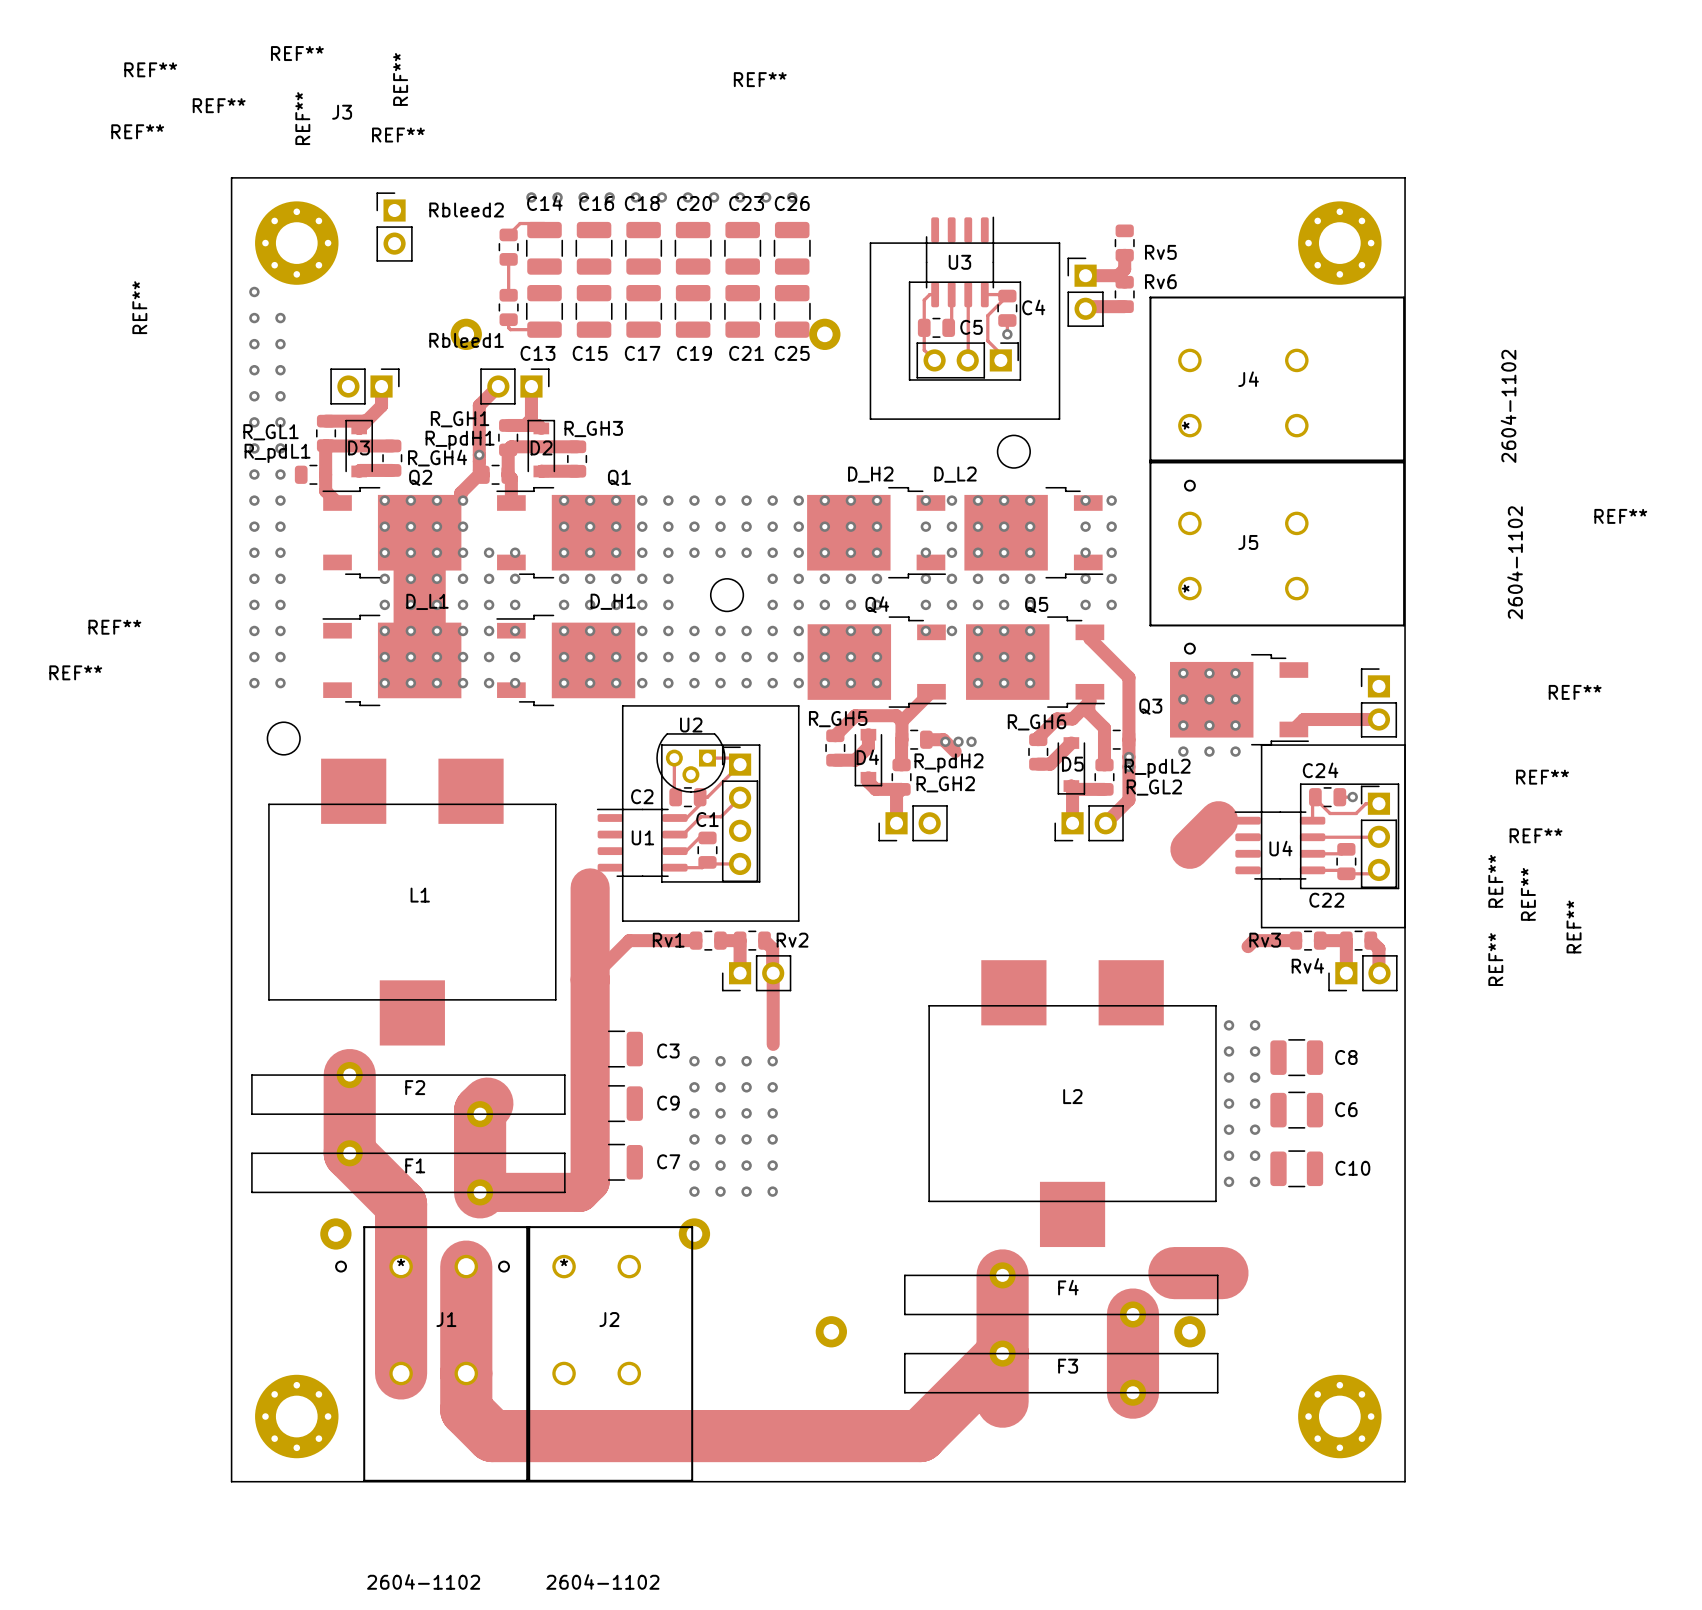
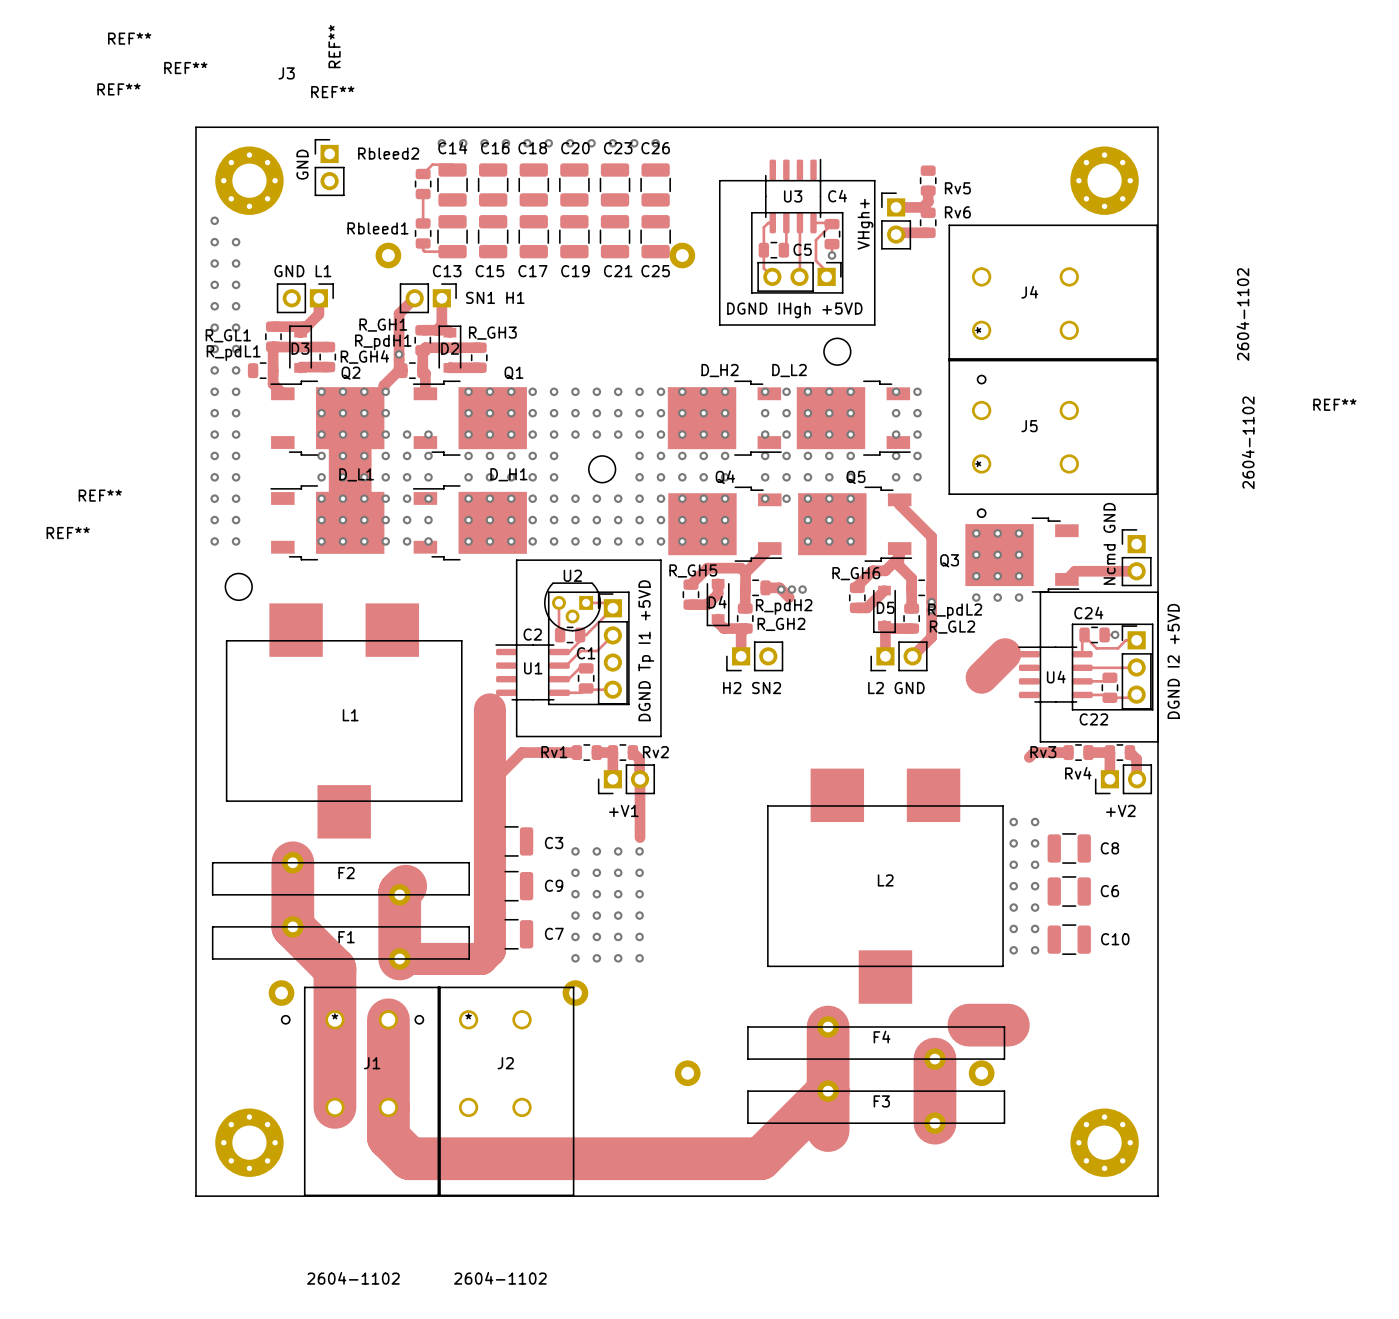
J3 footprint: [330, 192, 1398, 992] -> [276, 139, 1152, 795]
C4 name position: C4 (1033, 307) -> C4 (837, 196)
Rbleed1 name position: Rbleed1 (466, 340) -> Rbleed1 (377, 228)

